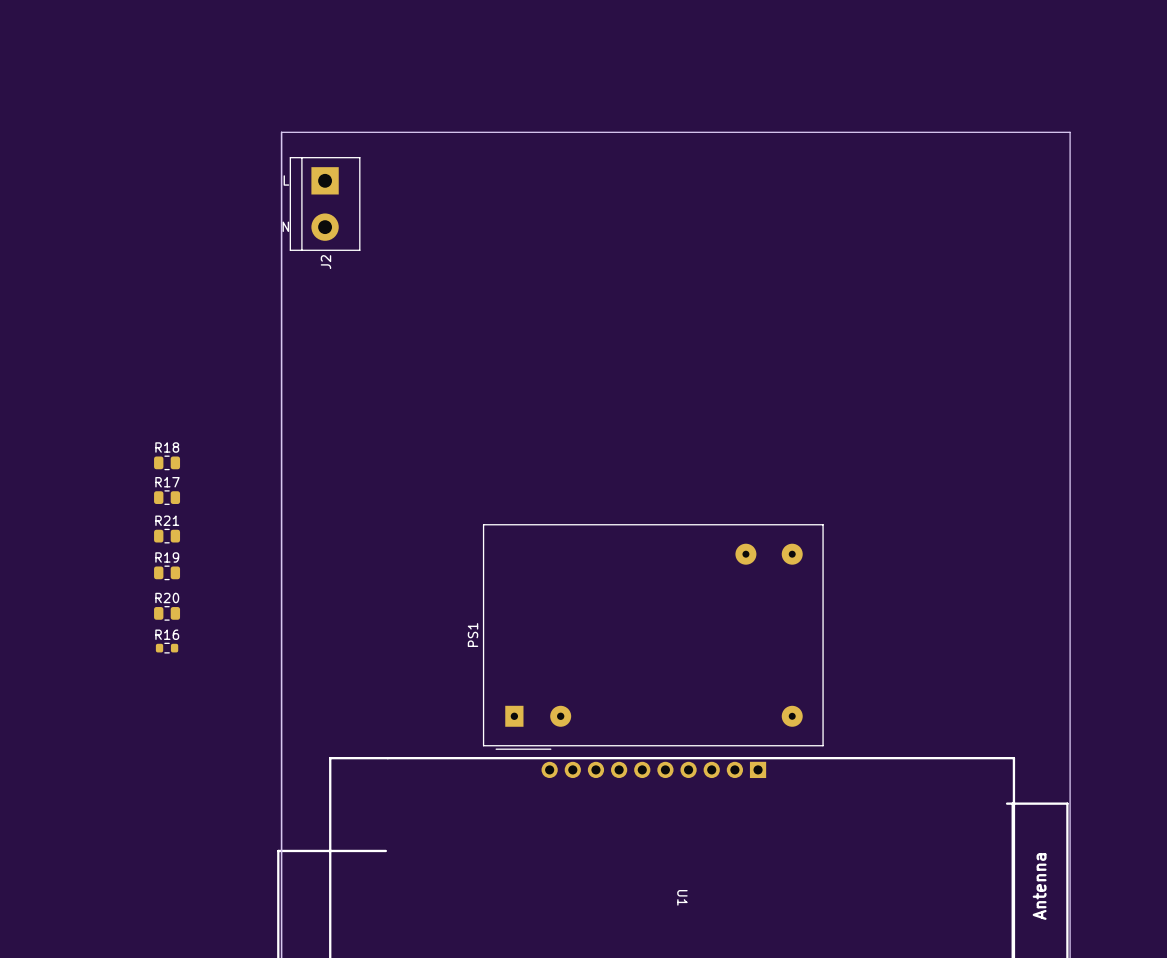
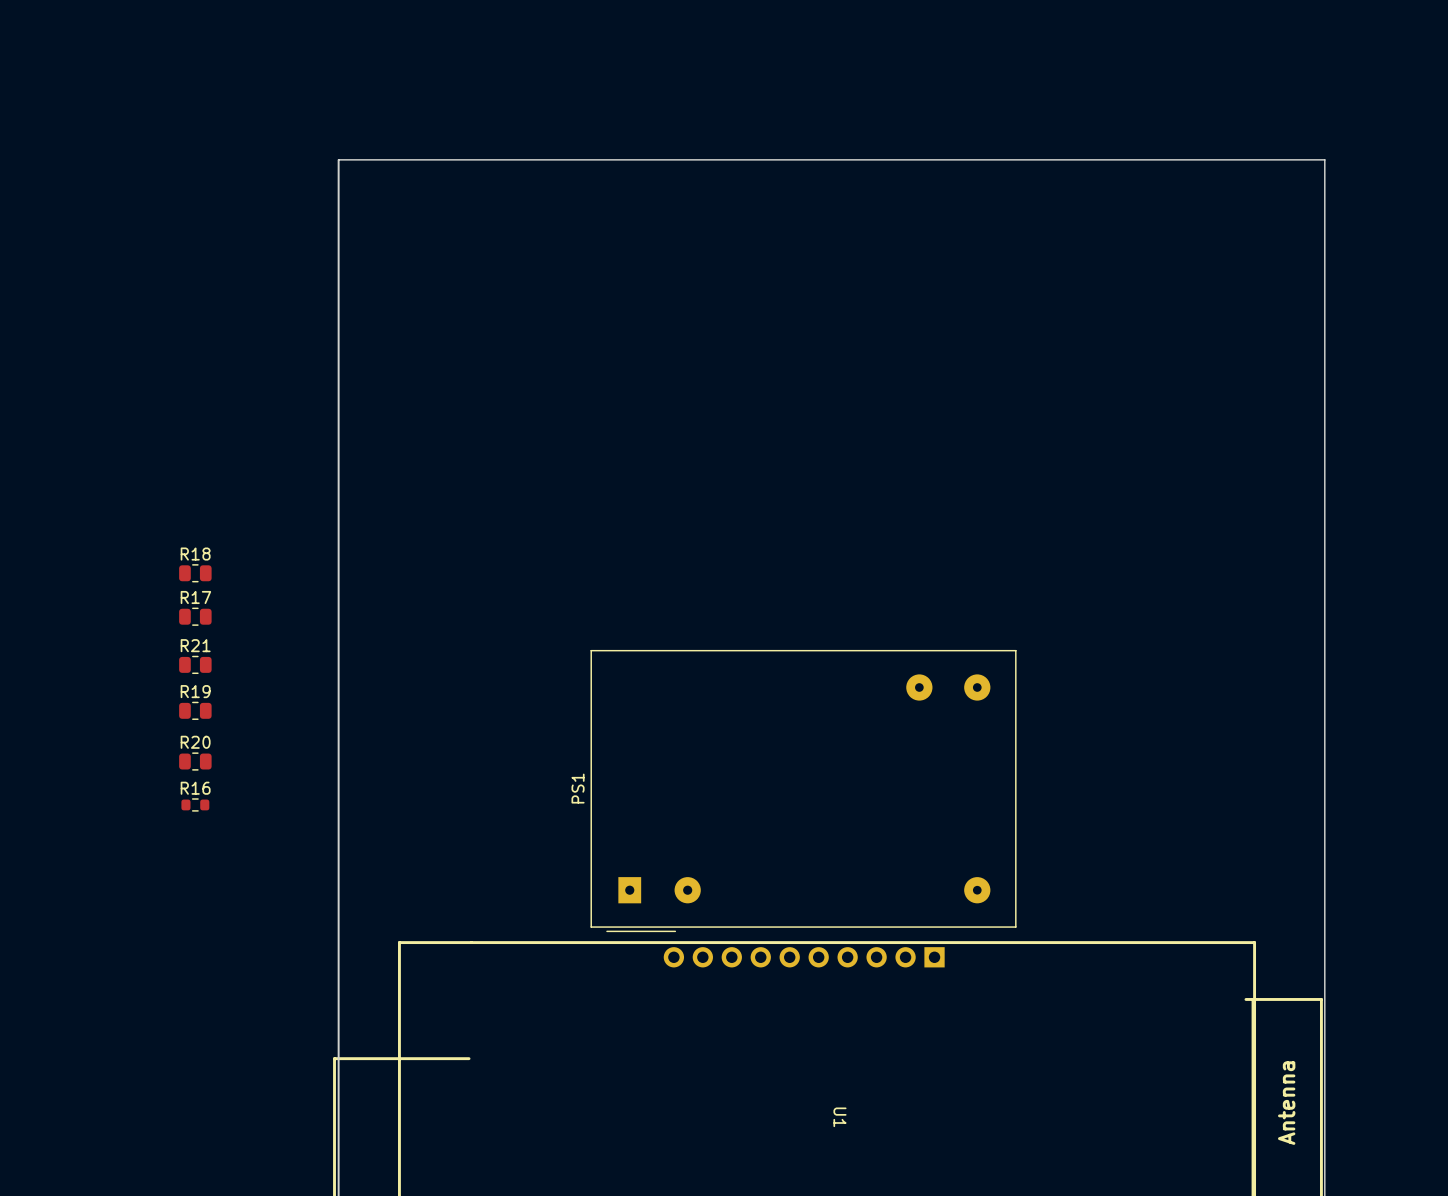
text: L (286, 180) -> none
J2: (325, 203) -> none
text: N (285, 226) -> none

